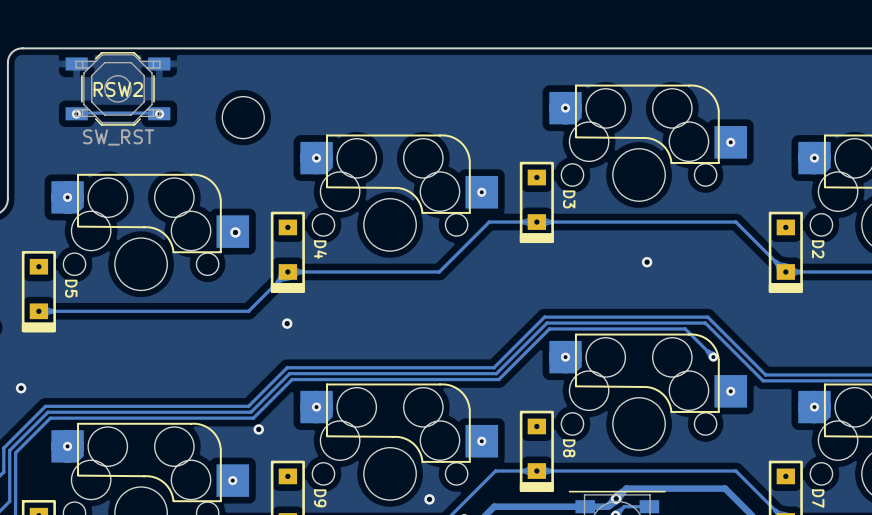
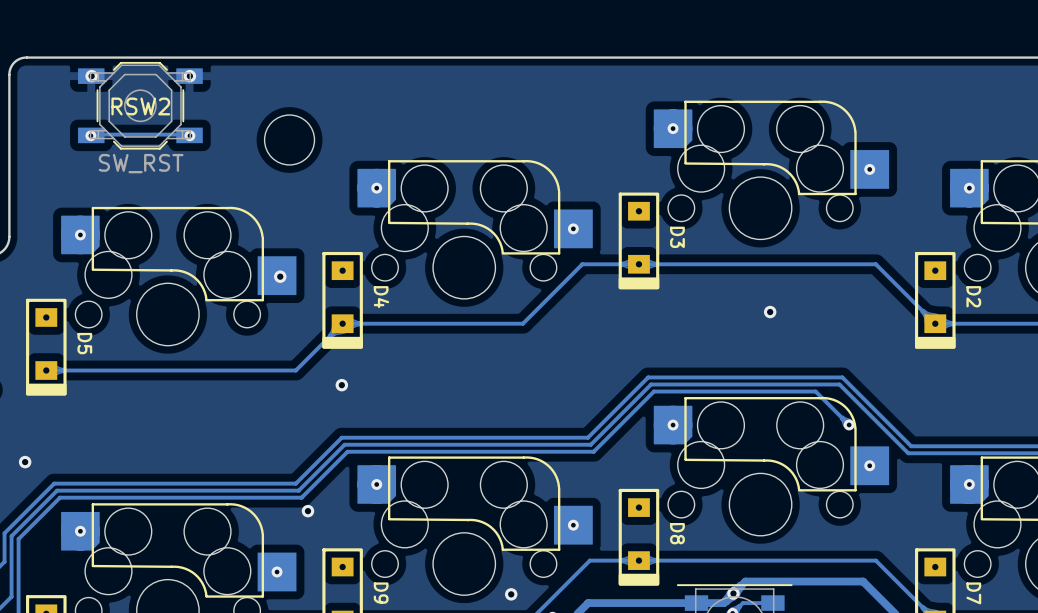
via: none -> (91, 76)
via: none -> (189, 76)

